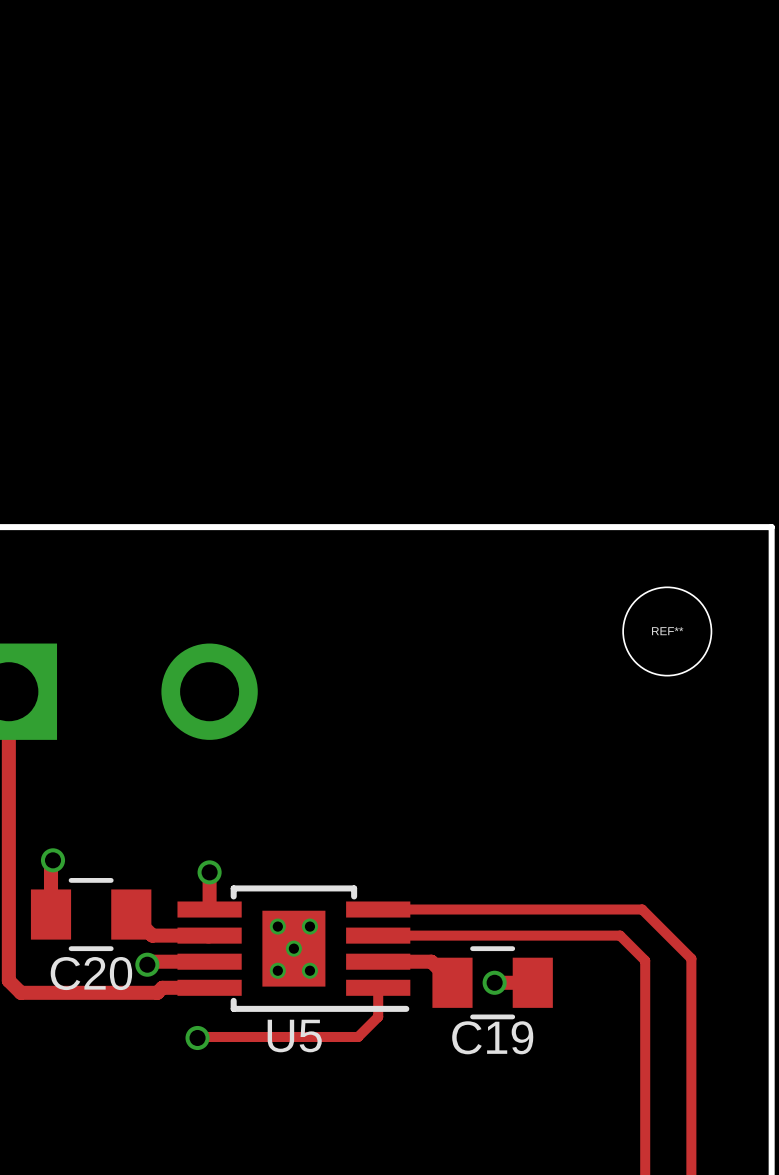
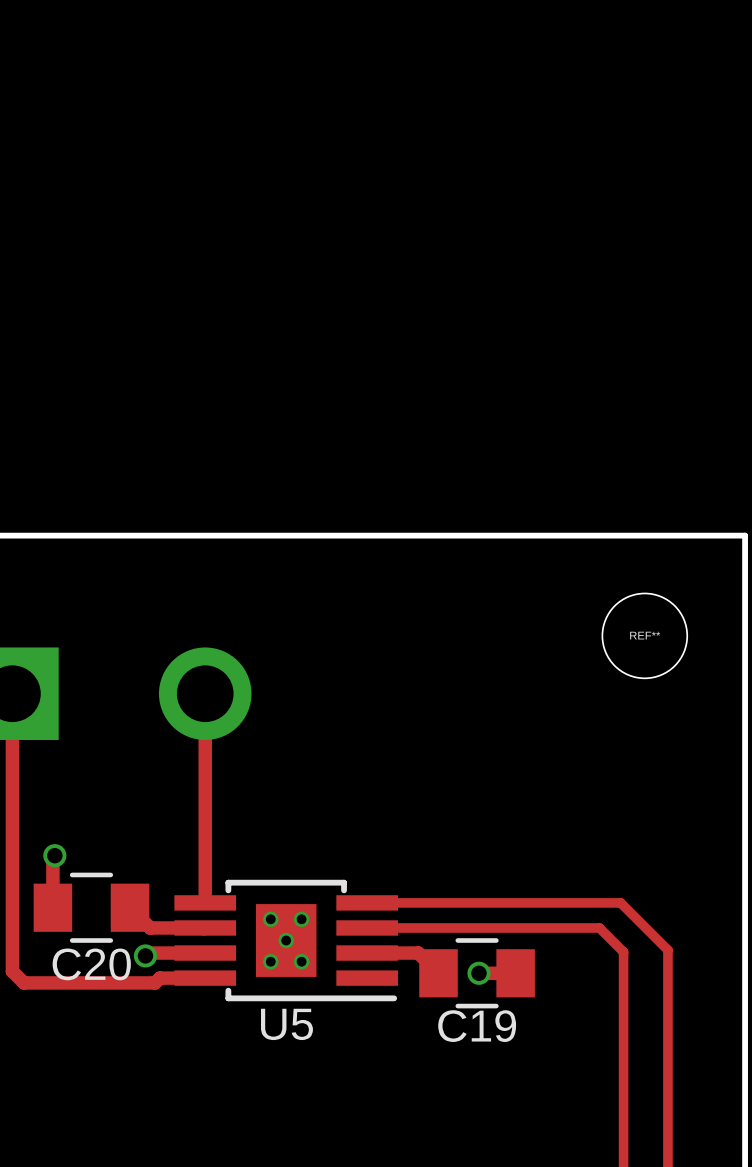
track: none -> (205, 693) (205, 867)
via: (209, 872) -> none
track: (378, 987) (378, 1016) (358, 1036) (197, 1037) -> none
via: (197, 1037) -> none

